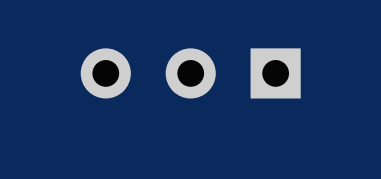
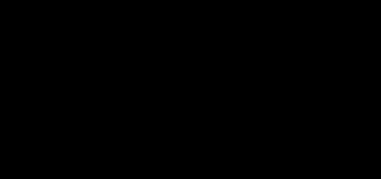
part: (190, 73) -> none

